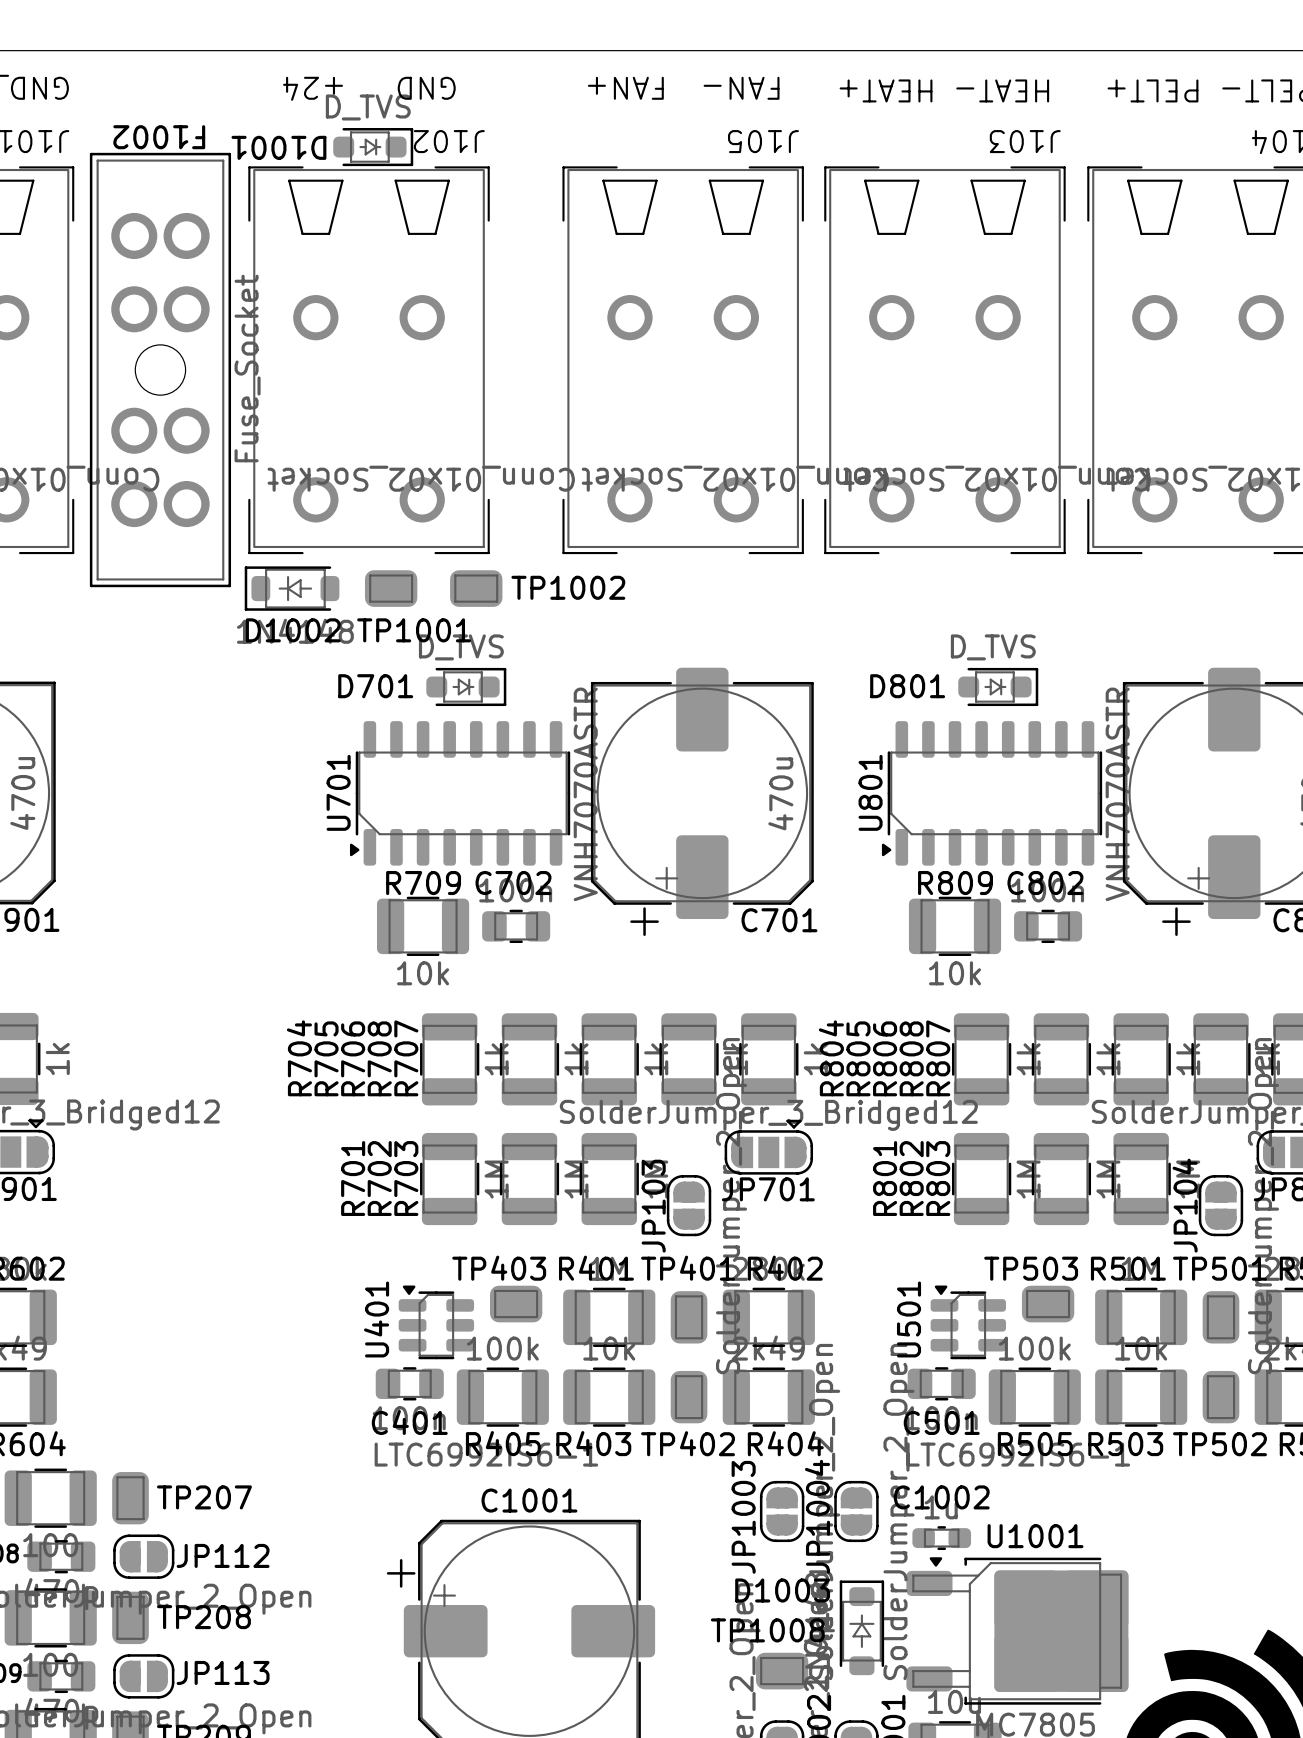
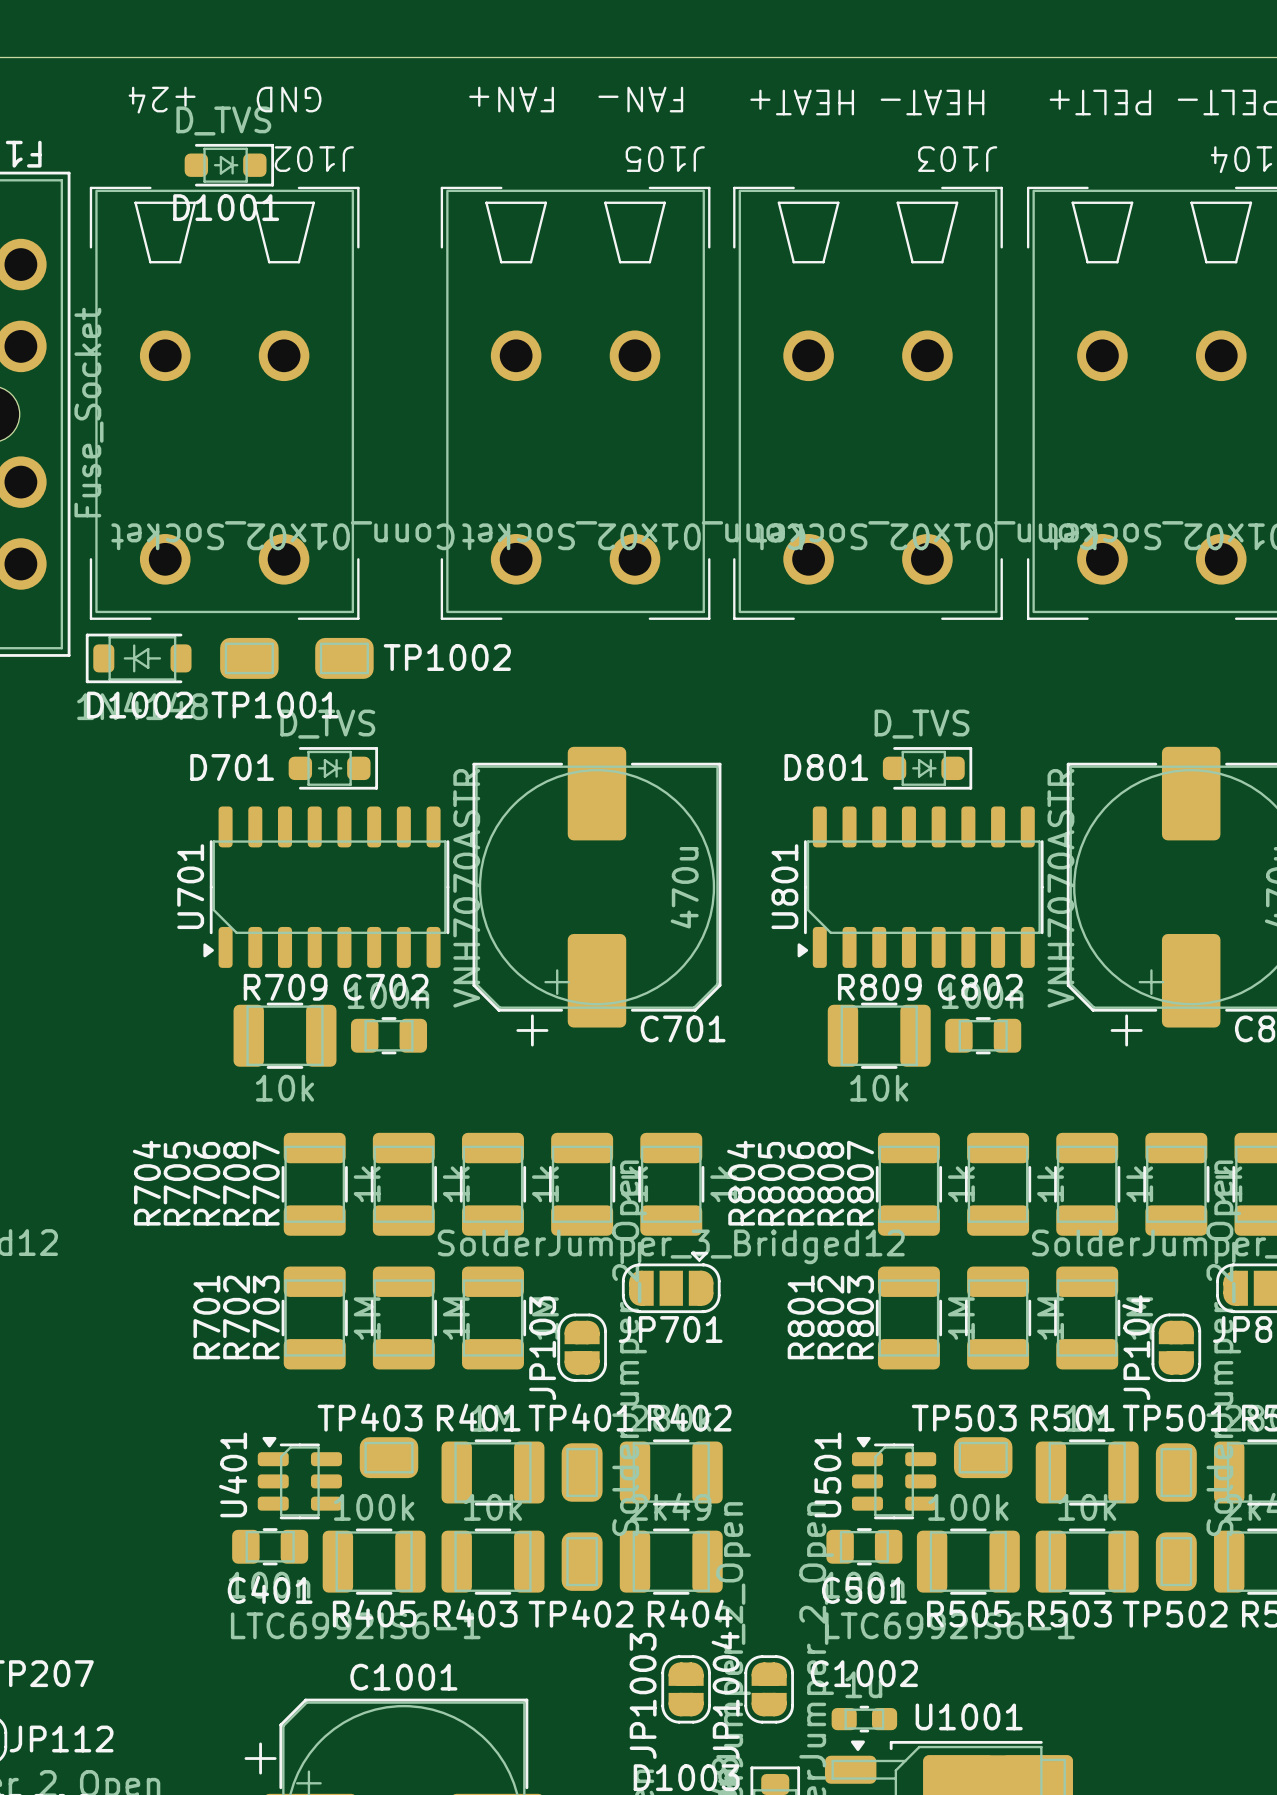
D1001 name rotation: 0° (278, 147) -> 180° (226, 207)

